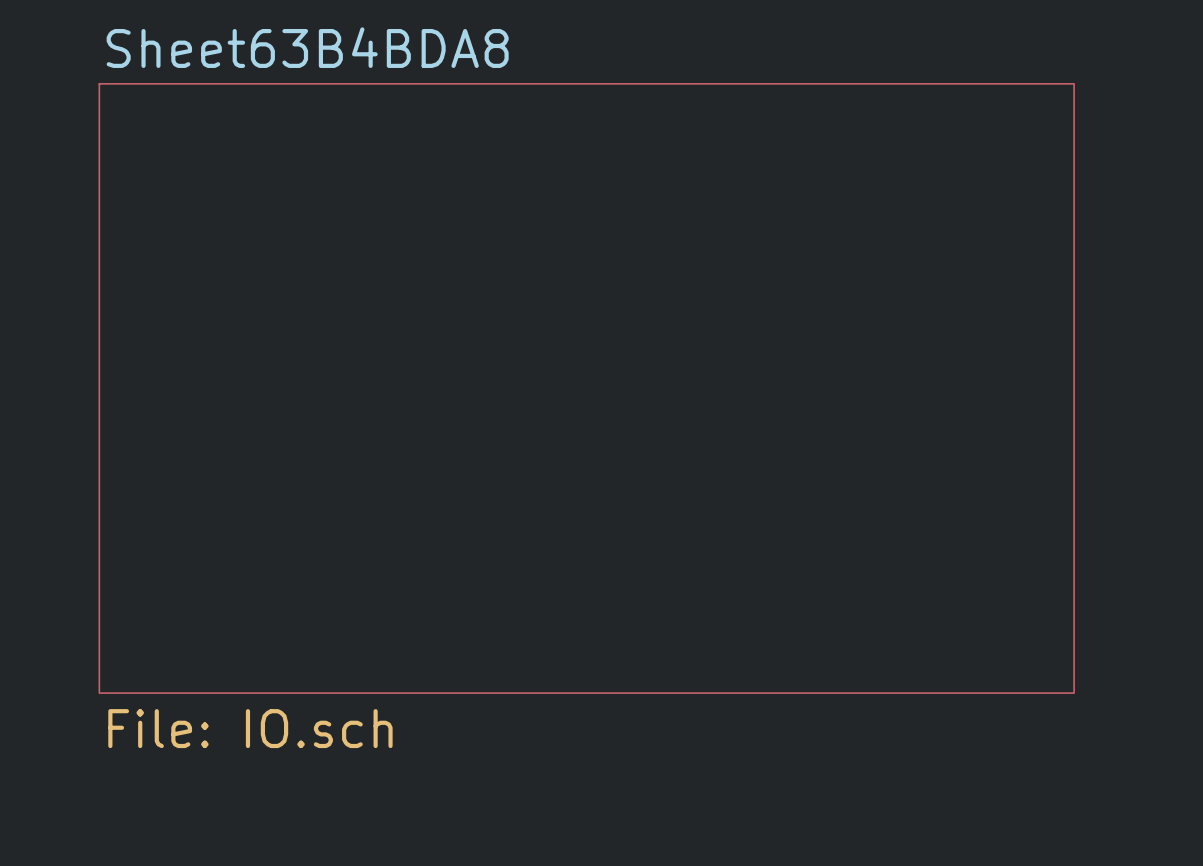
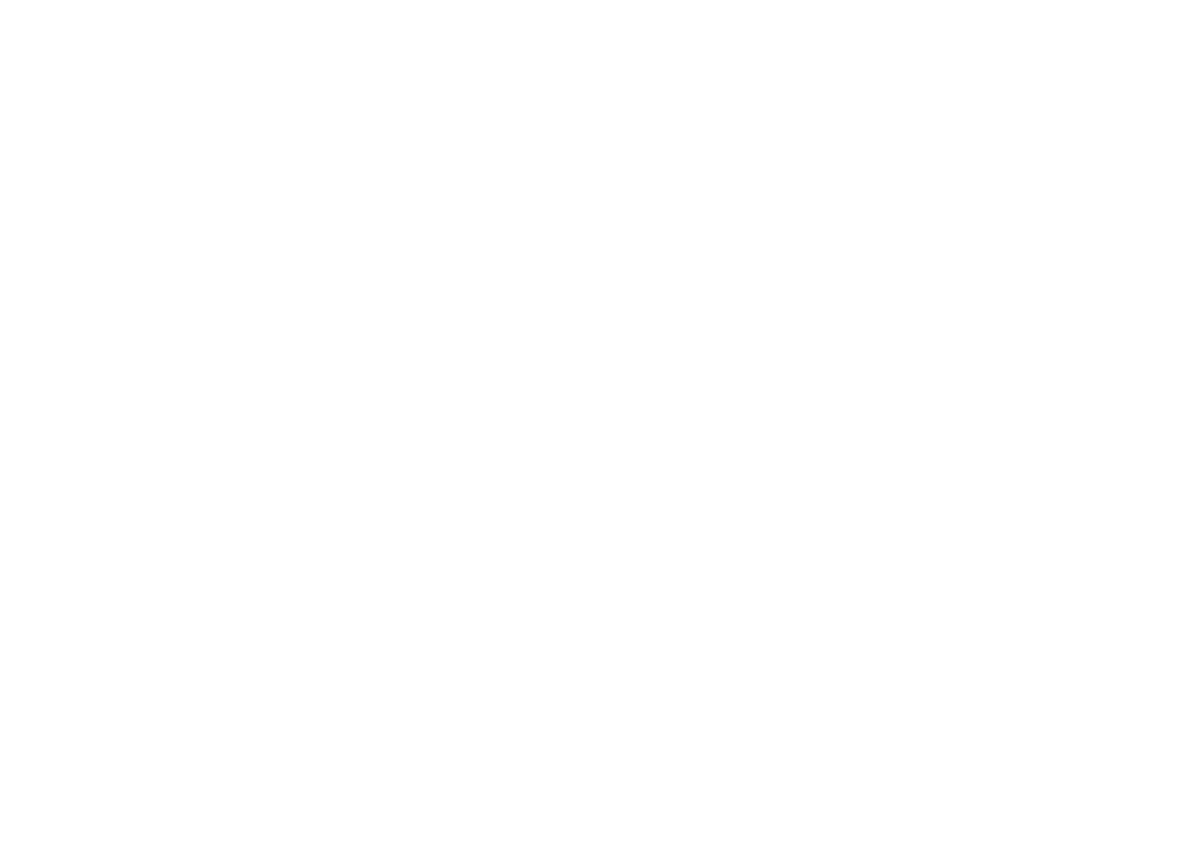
sheet Sheet63B4BDA8: File: IO.sch (586, 388) -> none

